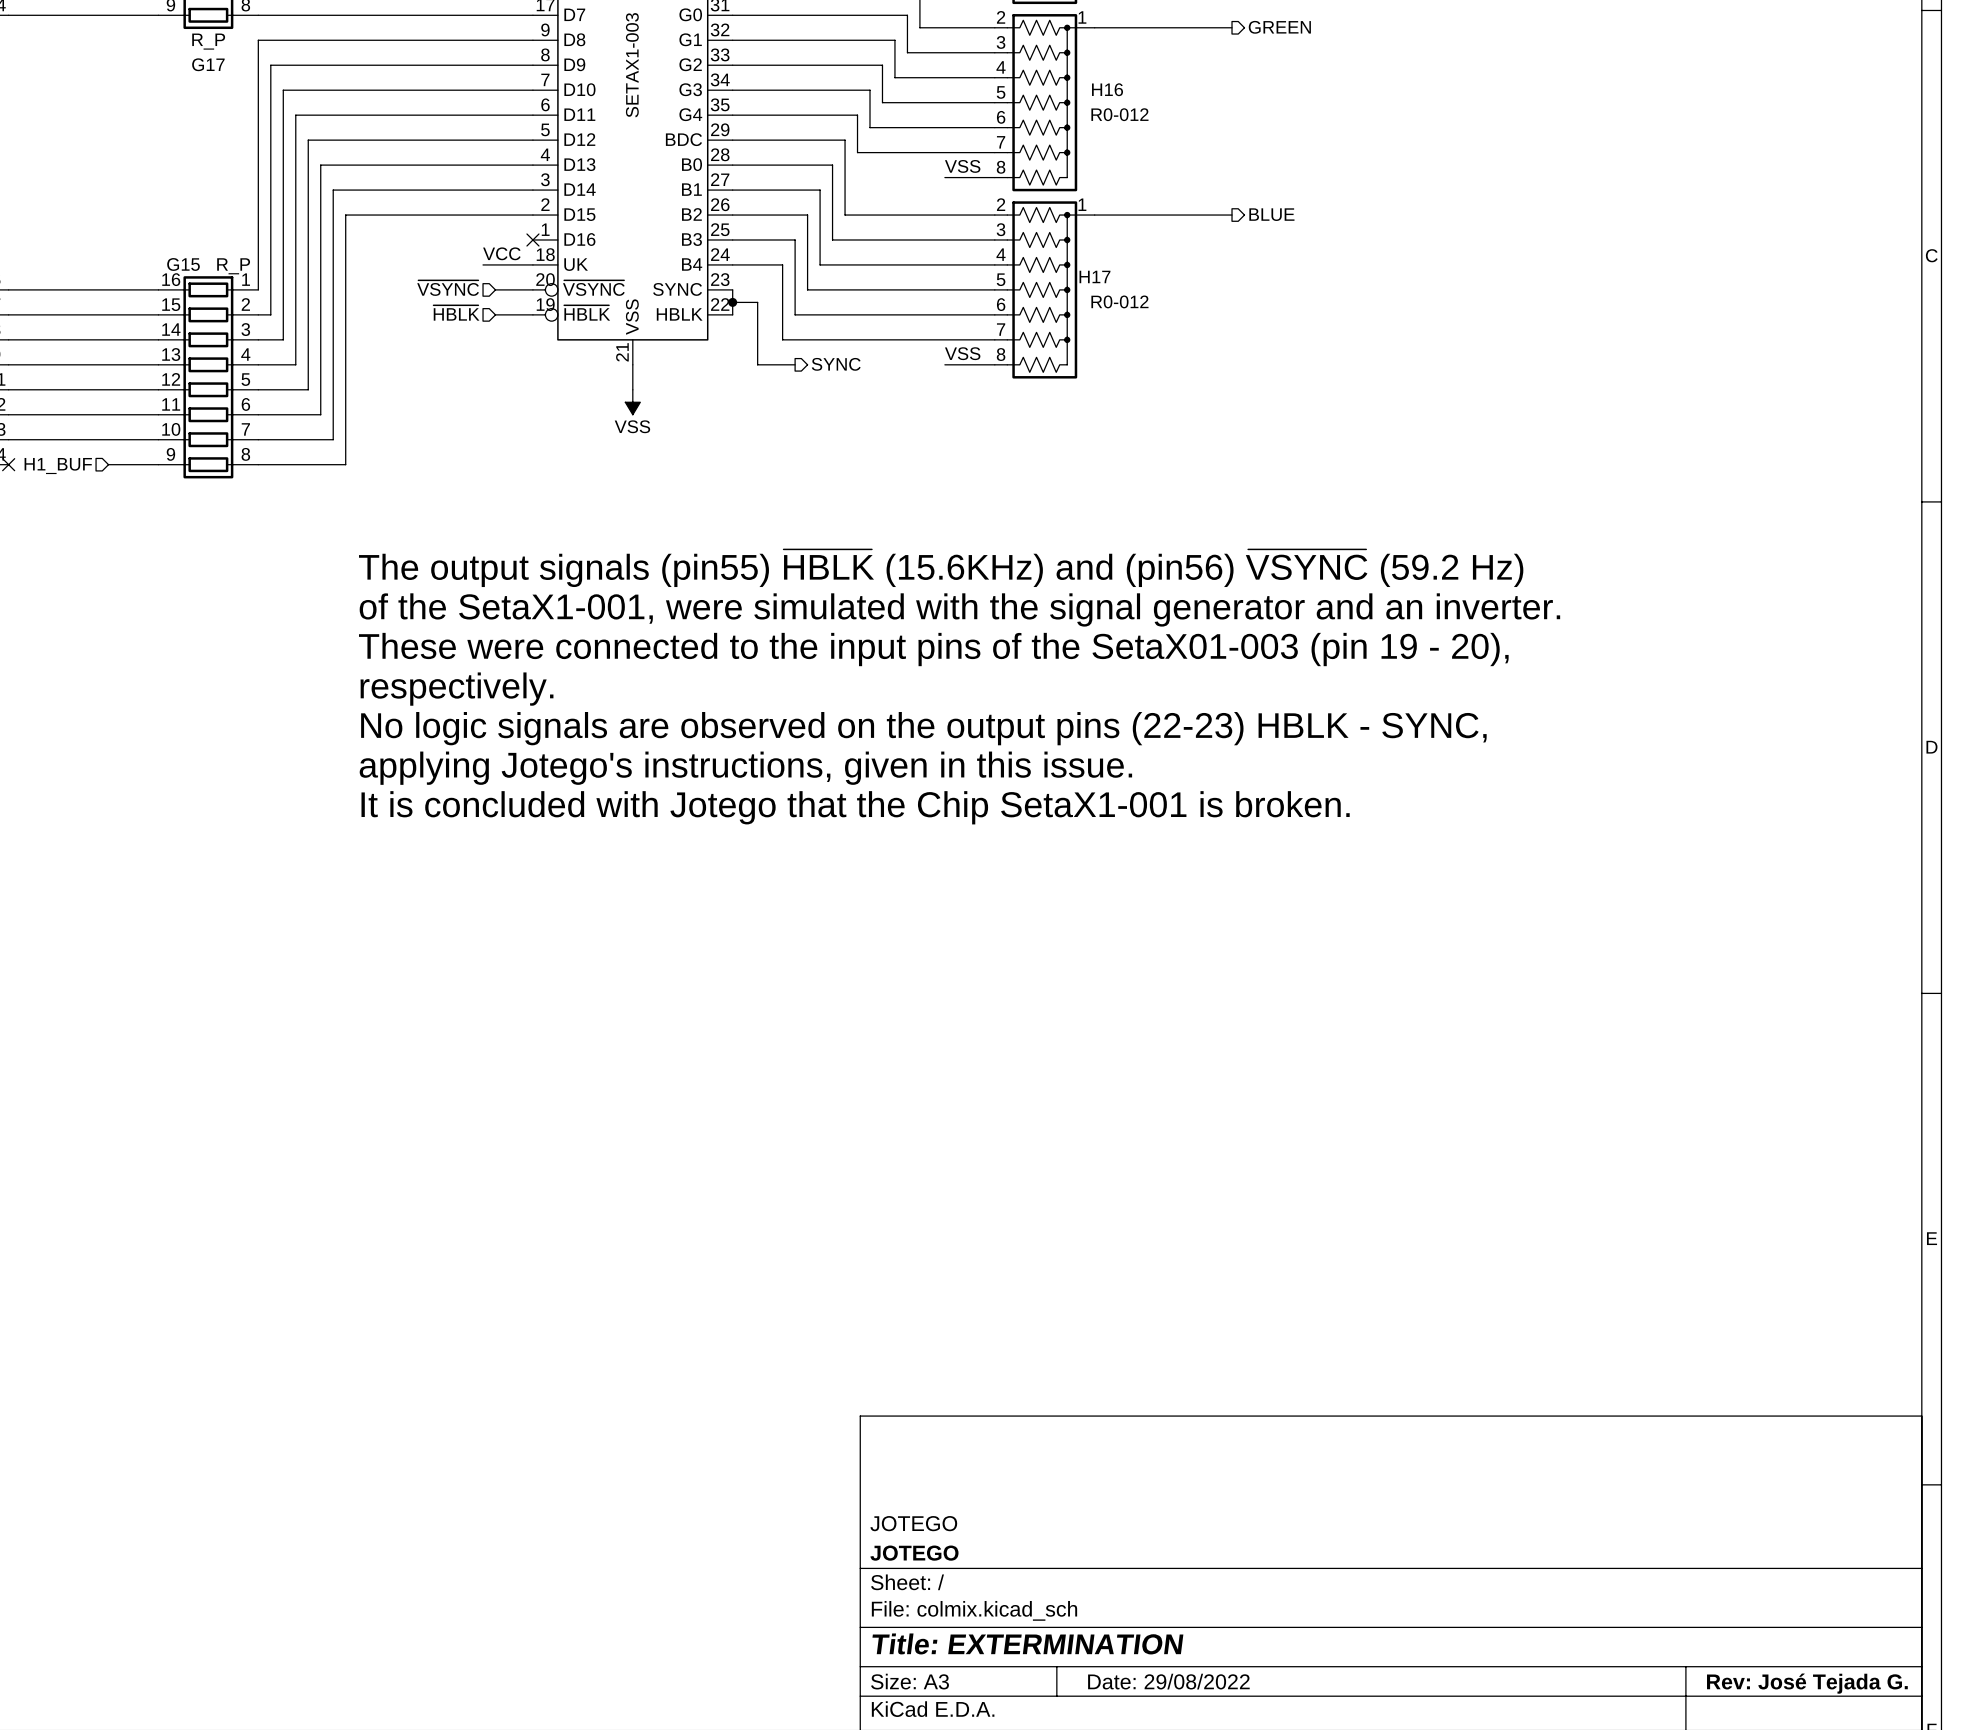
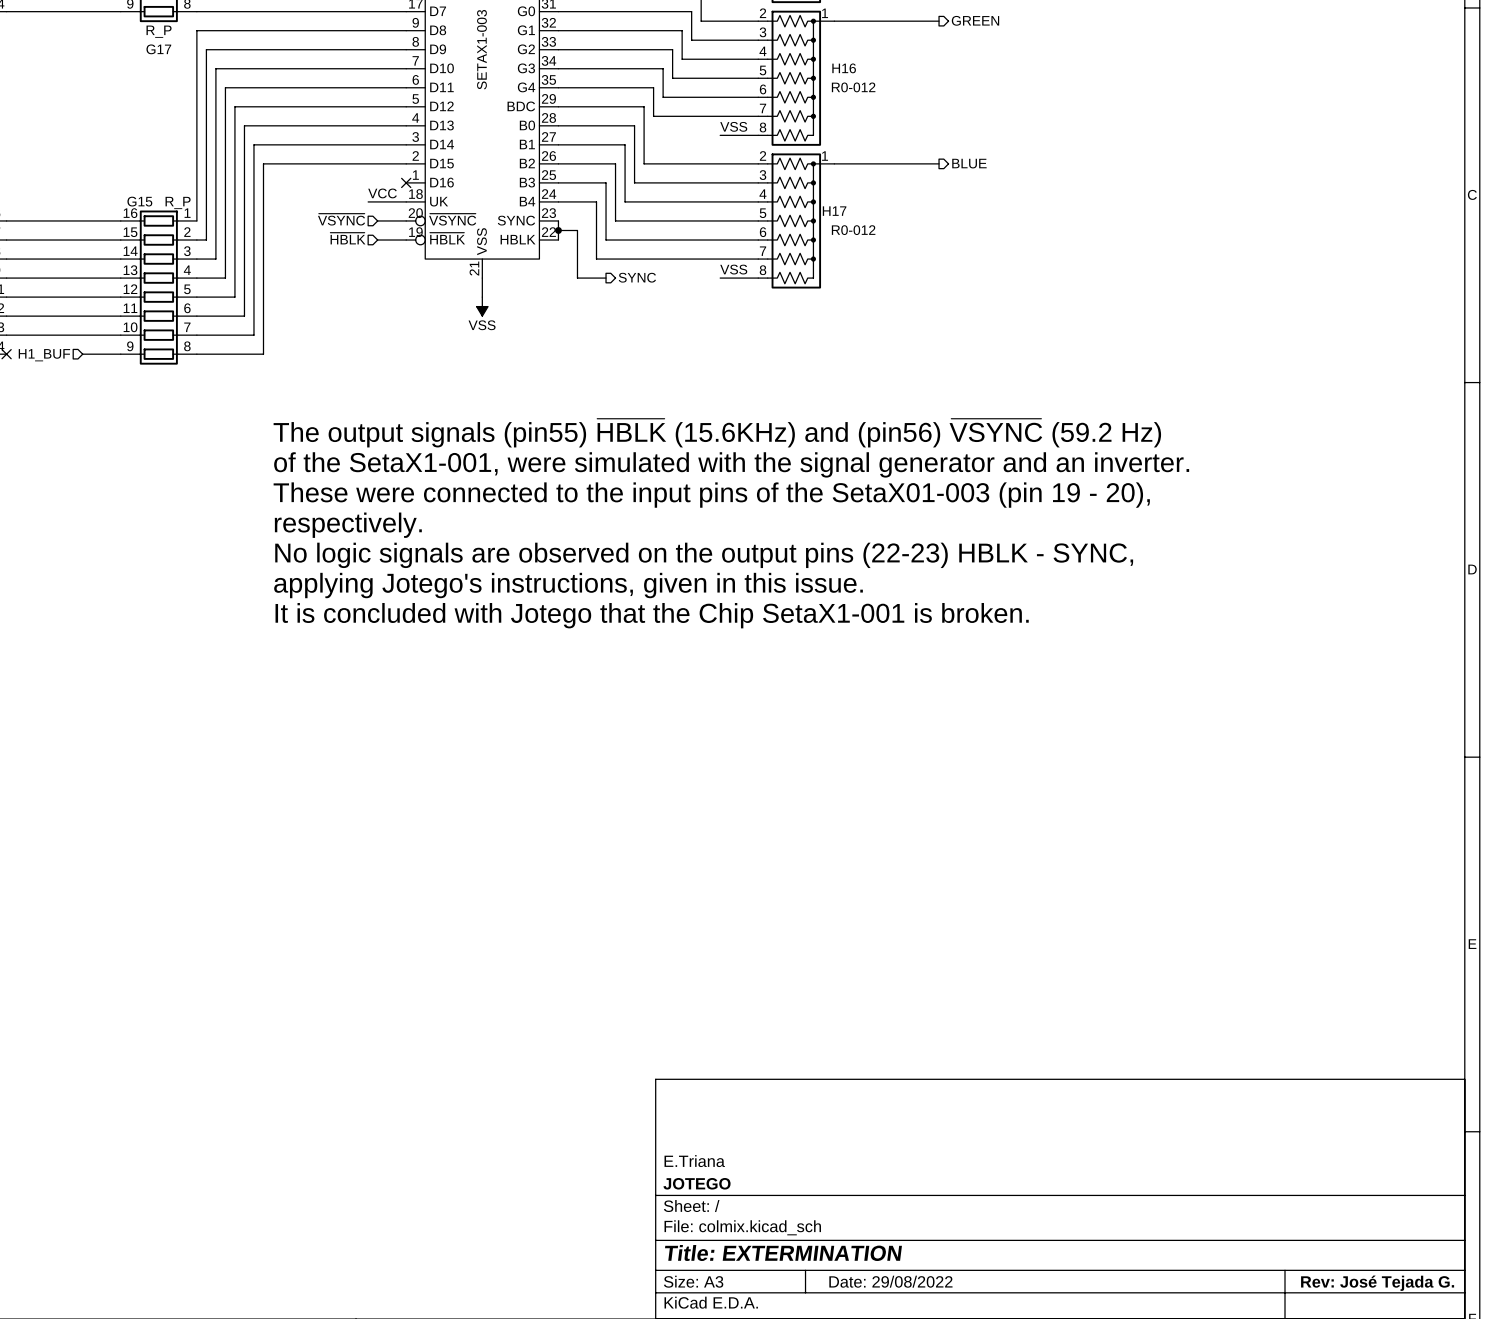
title block: JOTEGO (913, 1523) -> E.Triana (694, 1161)

